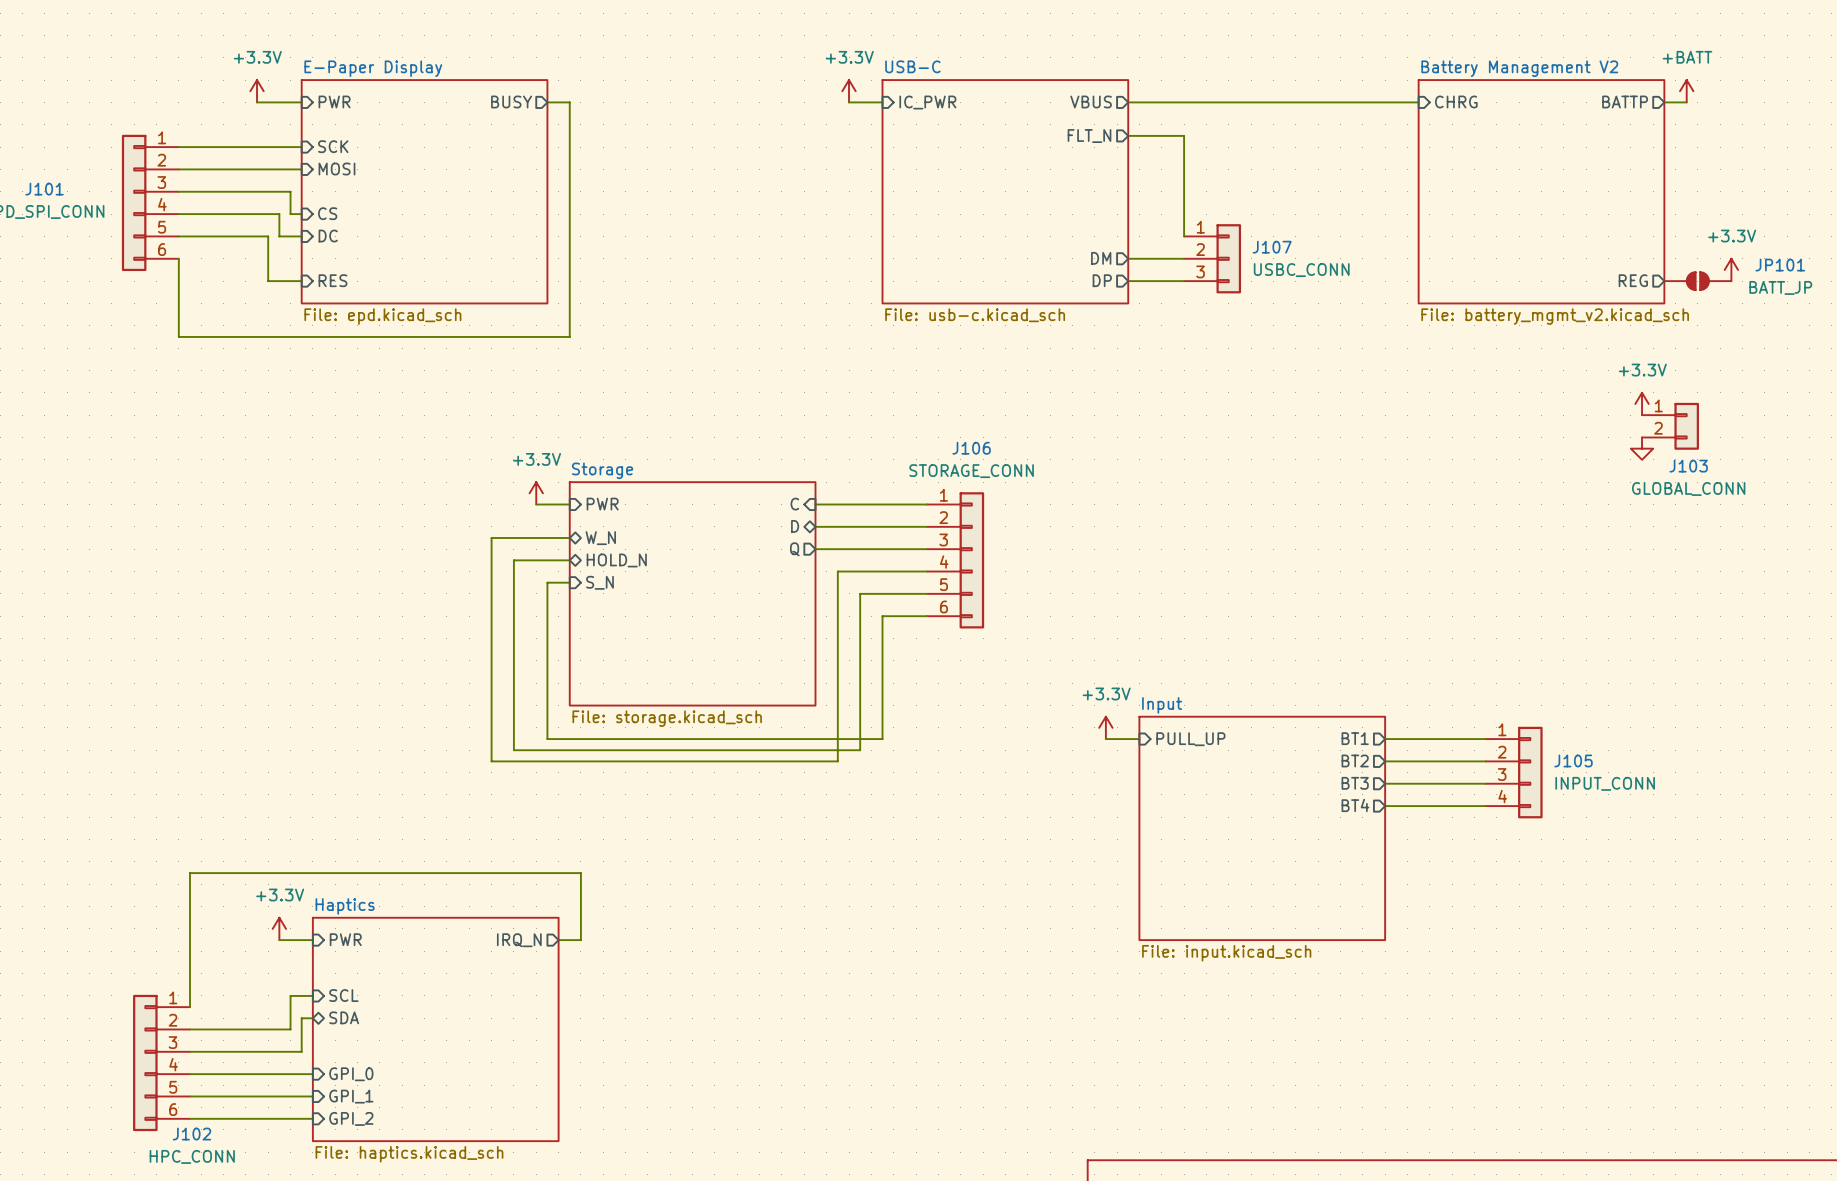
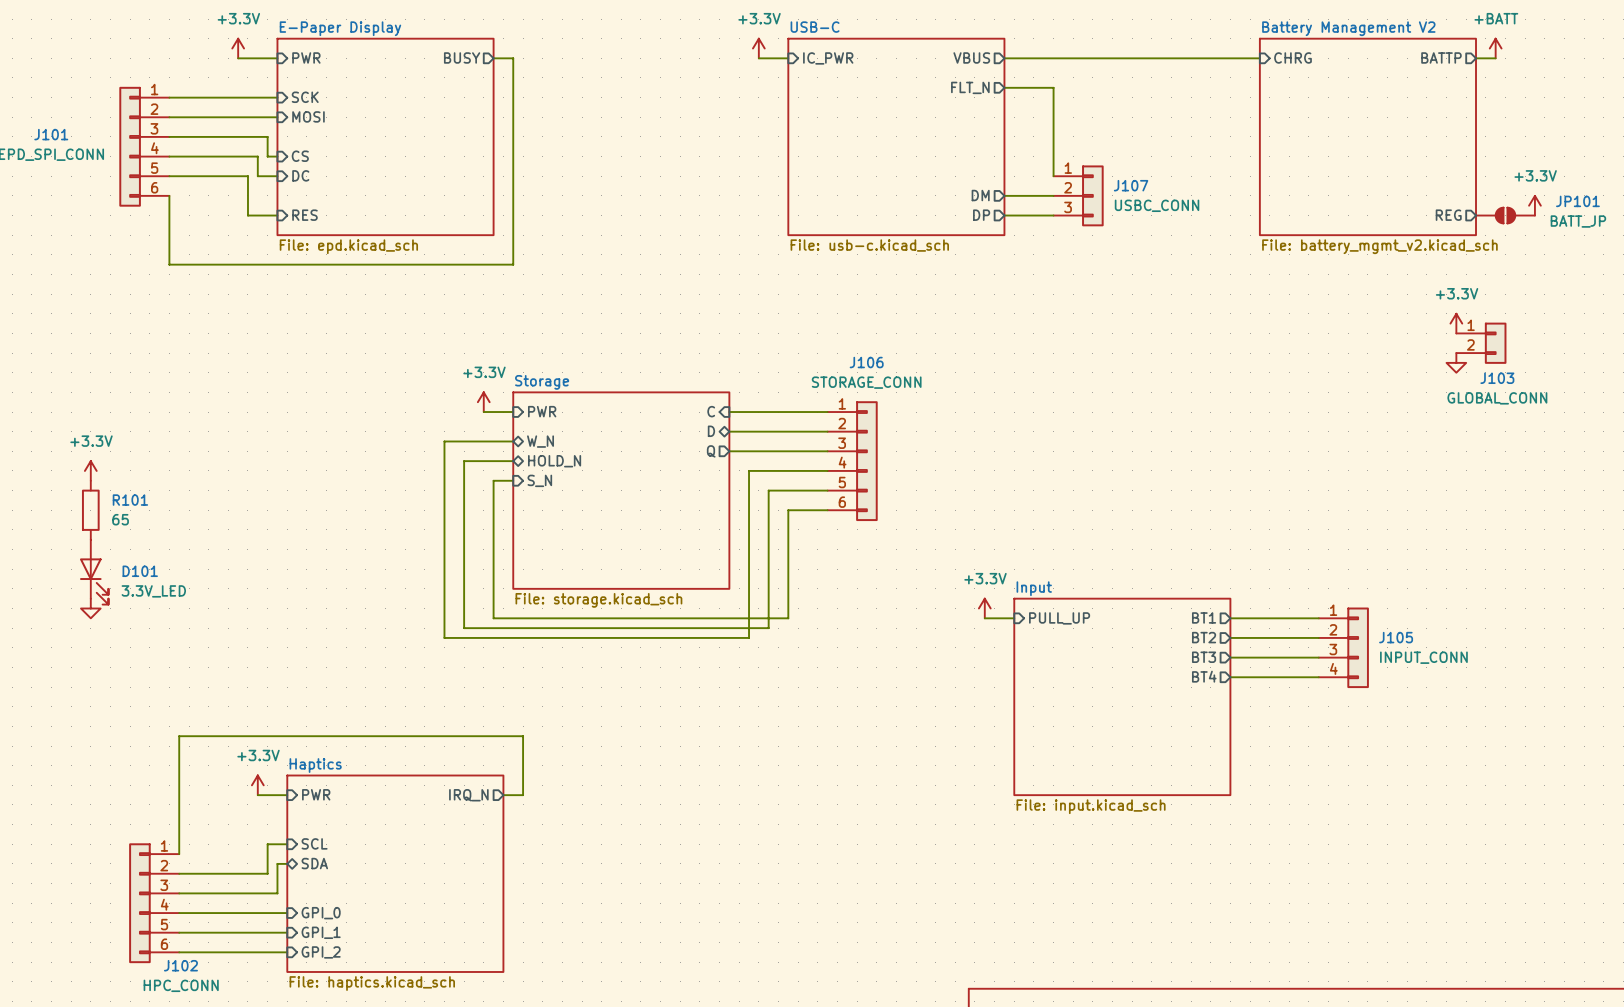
power symbol: none -> +3.3V (90, 470)
R101: none -> 65 (90, 510)
D101: none -> 3.3V_LED (94, 572)
power symbol: none -> (90, 608)

